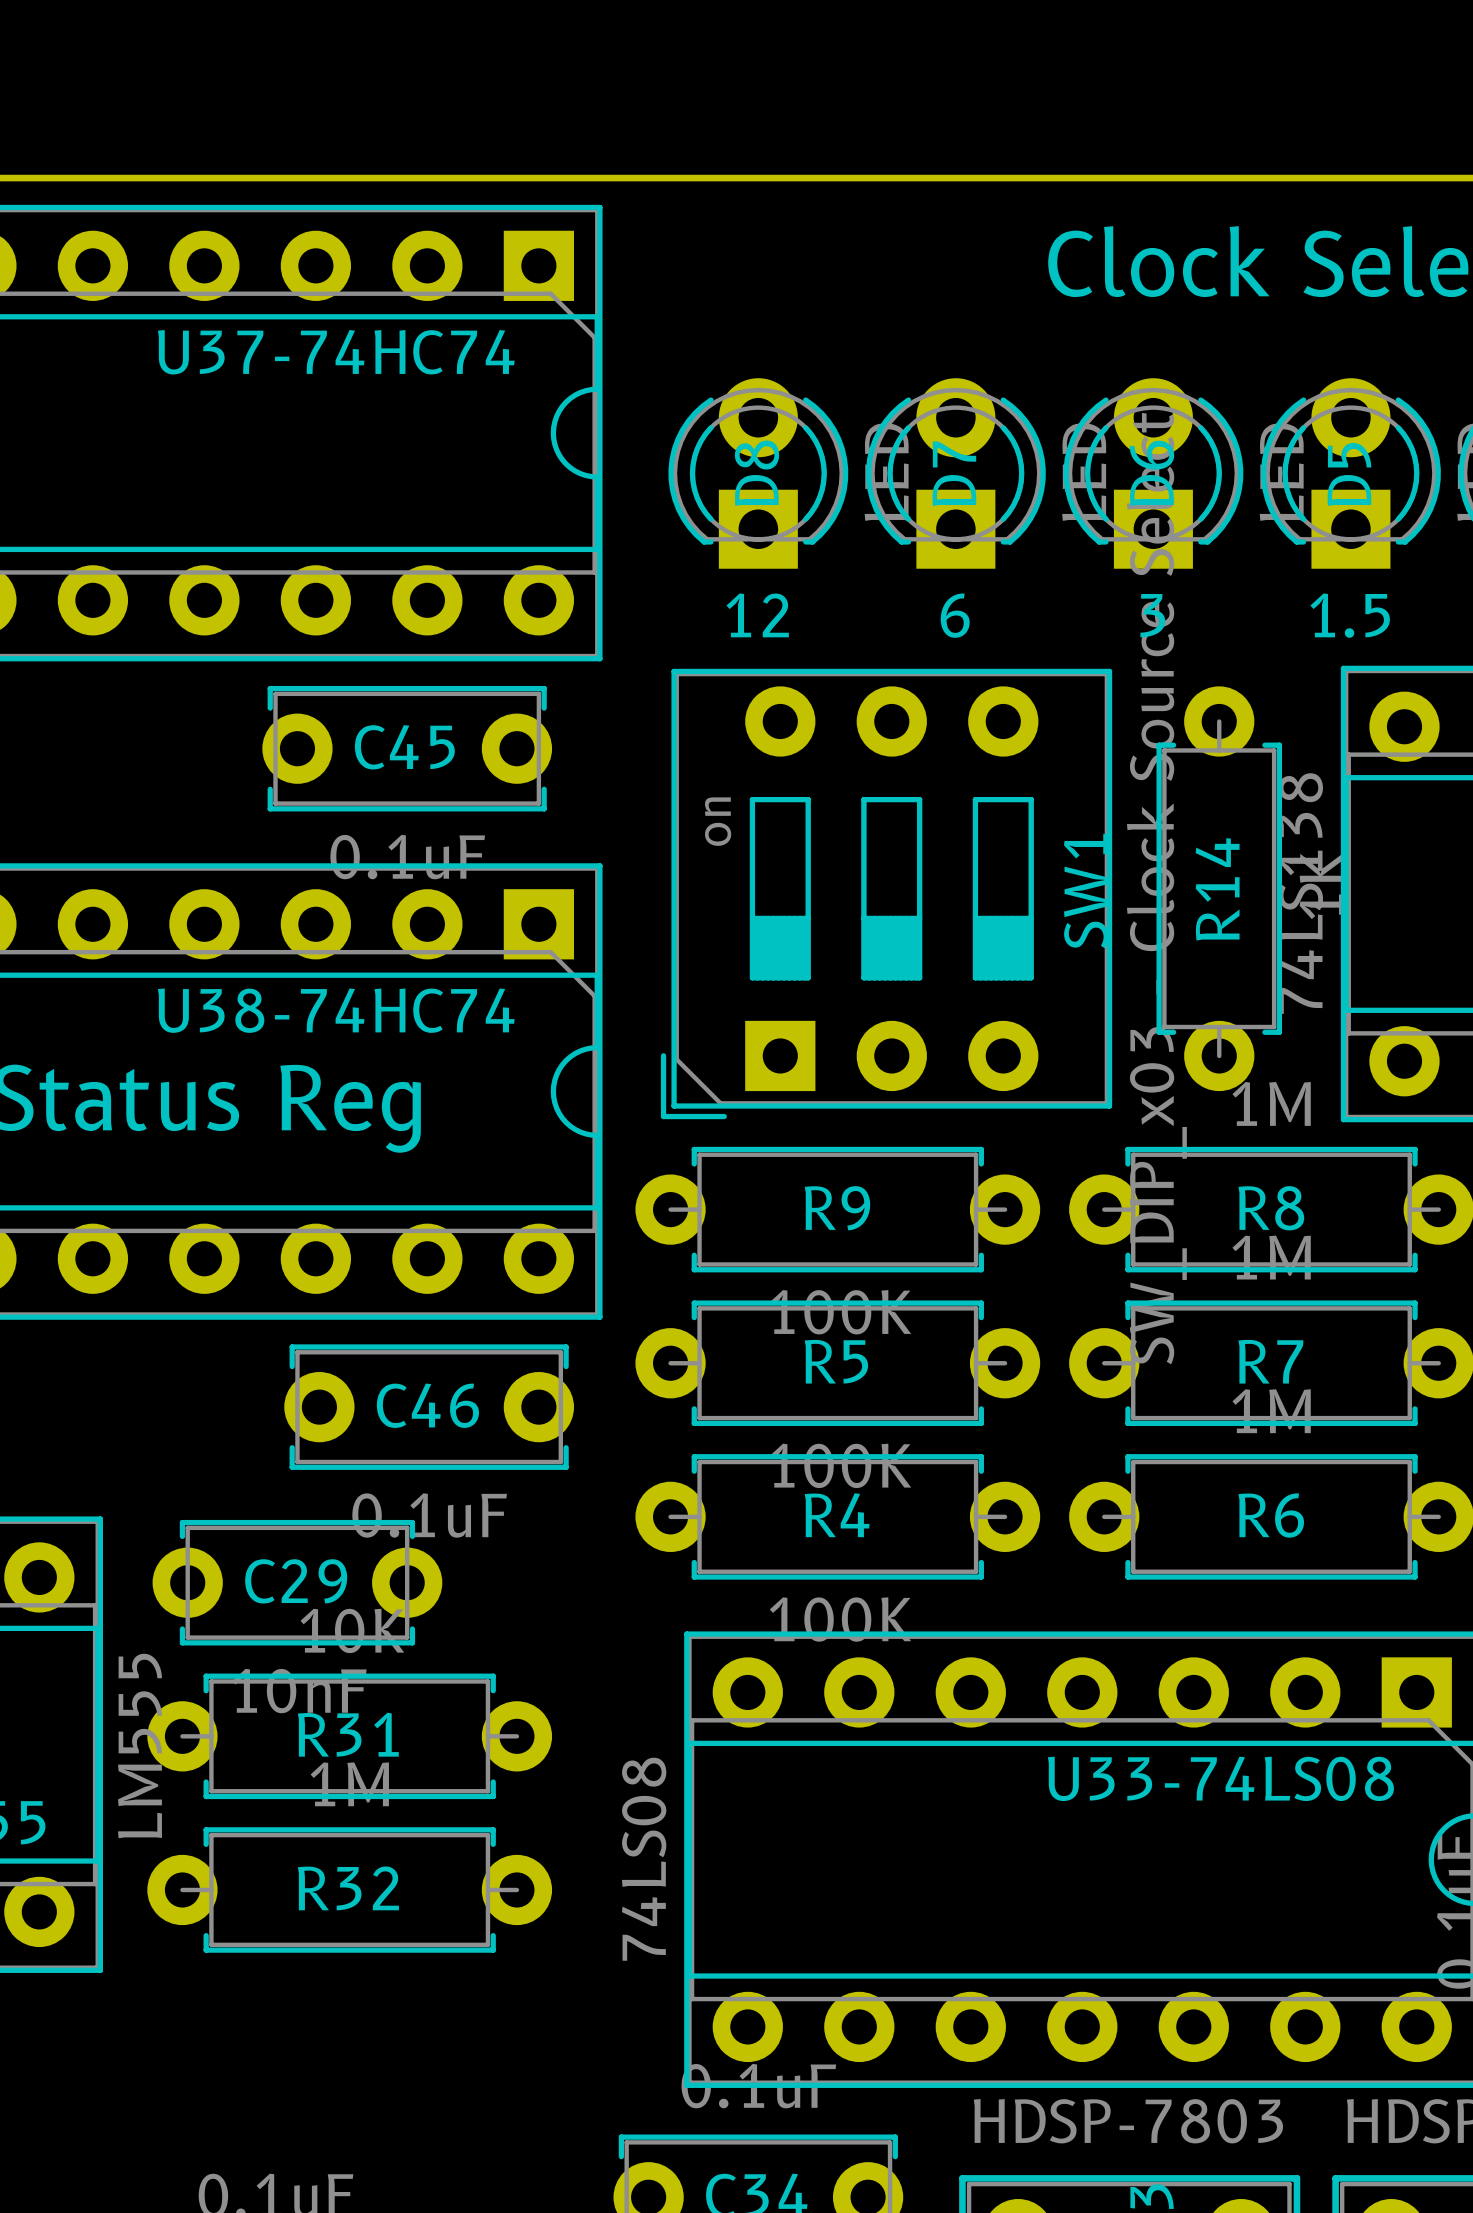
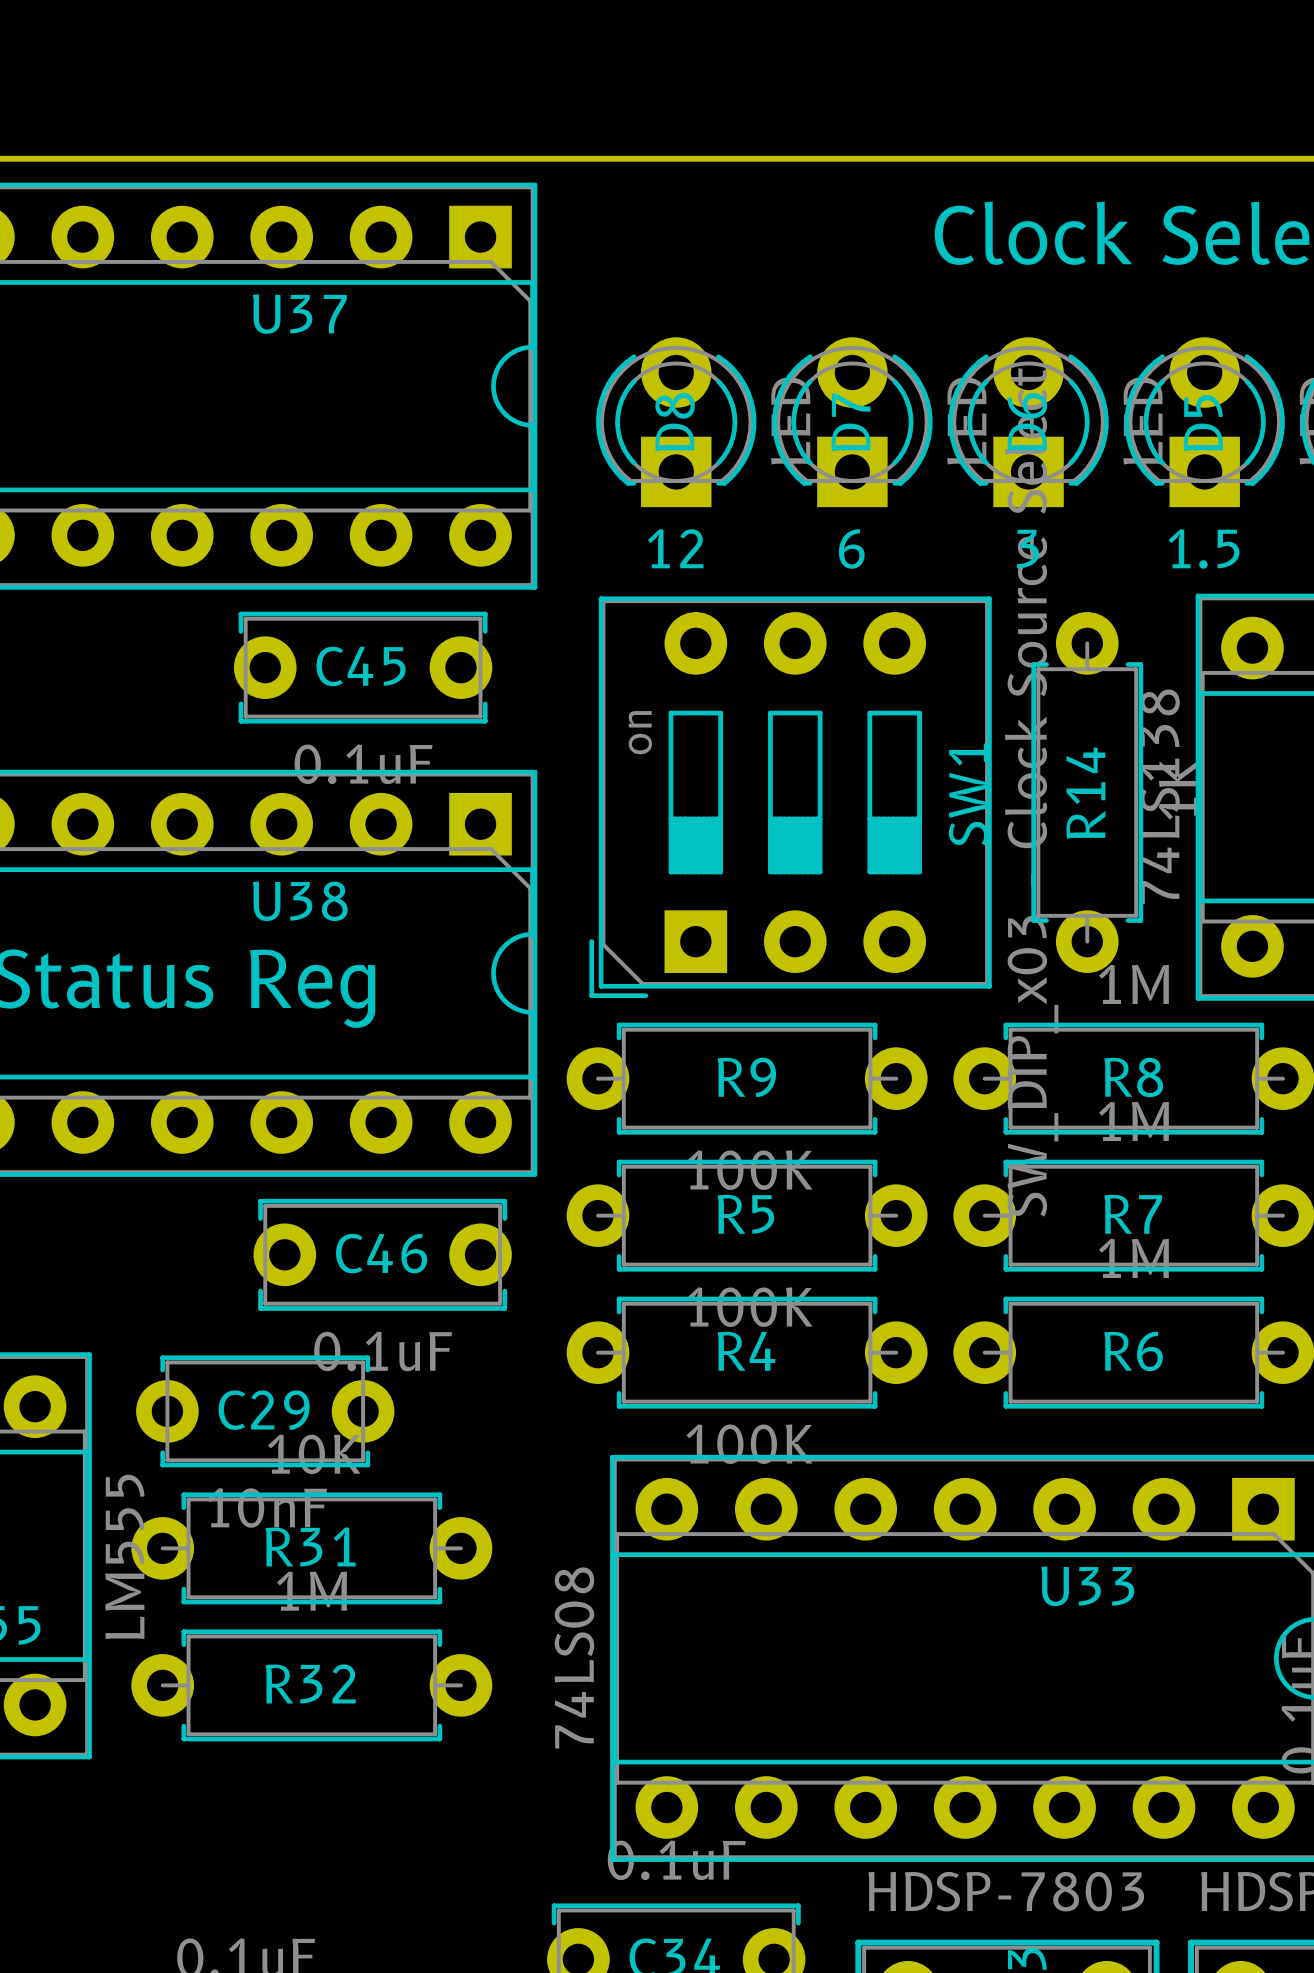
U37-74HC74 name: U37-74HC74 (336, 352) -> U37 (299, 314)
U38-74HC74 name: U38-74HC74 (336, 1010) -> U38 (300, 901)
U33-74LS08 name: U33-74LS08 (1220, 1778) -> U33 (1087, 1586)

